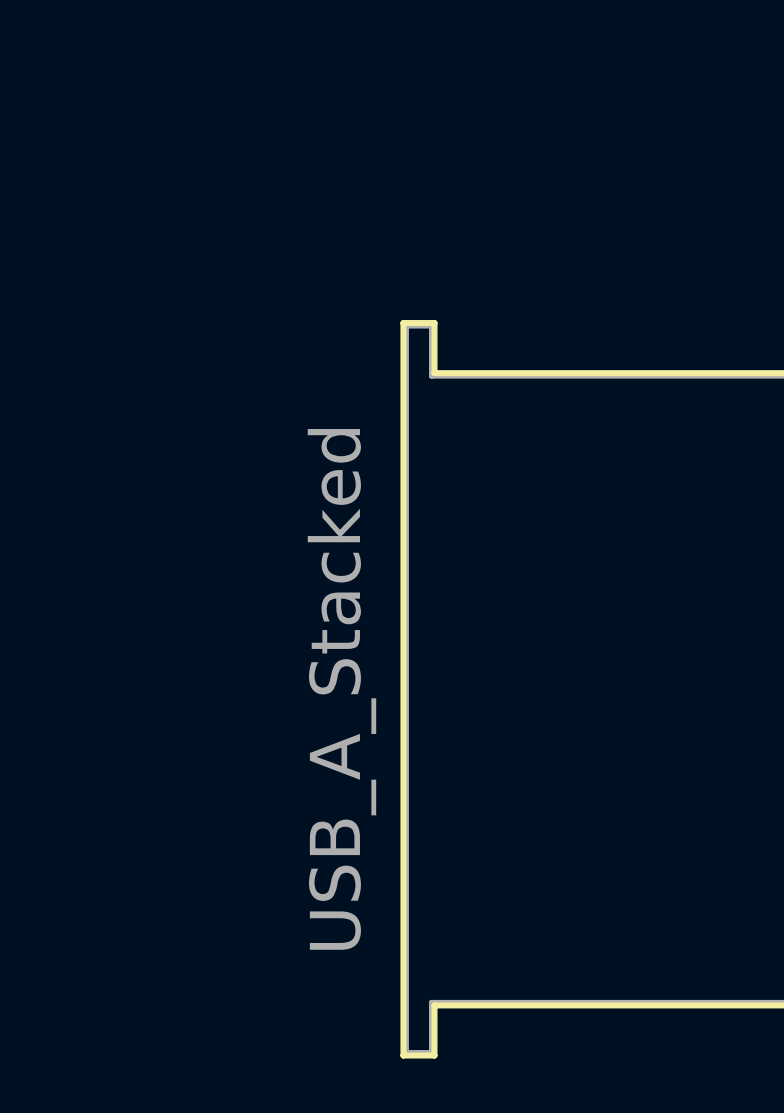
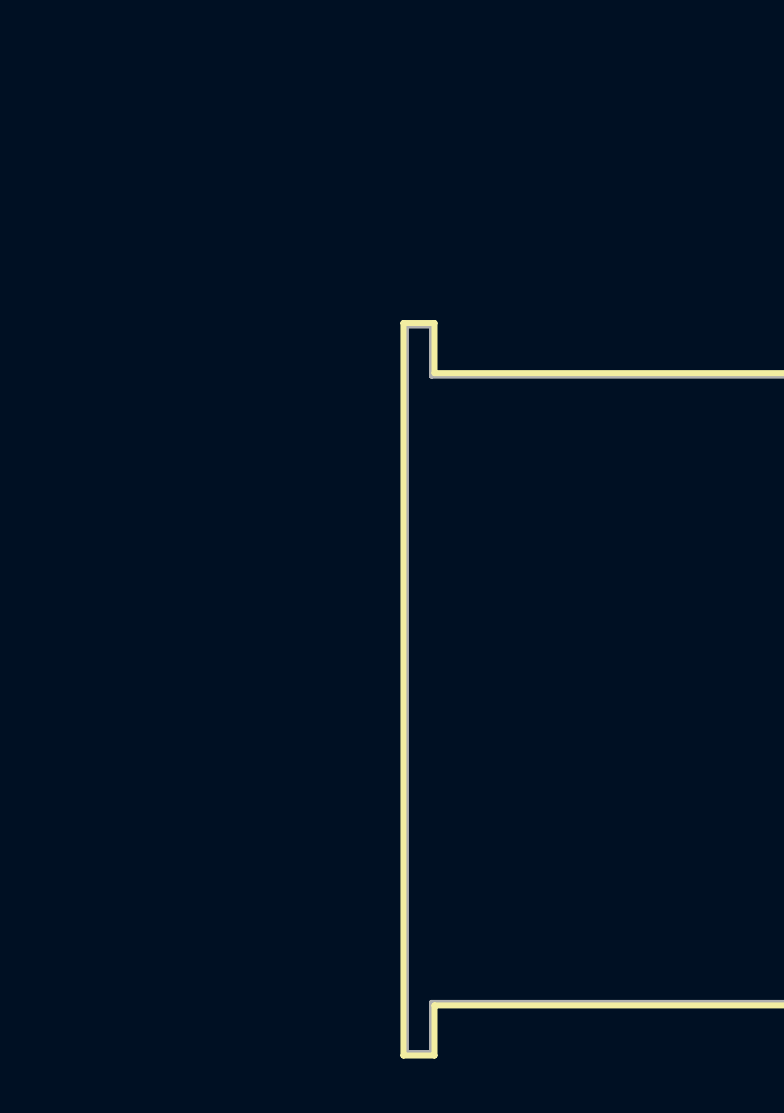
part value: USB_A_Stacked (341, 689) -> none

